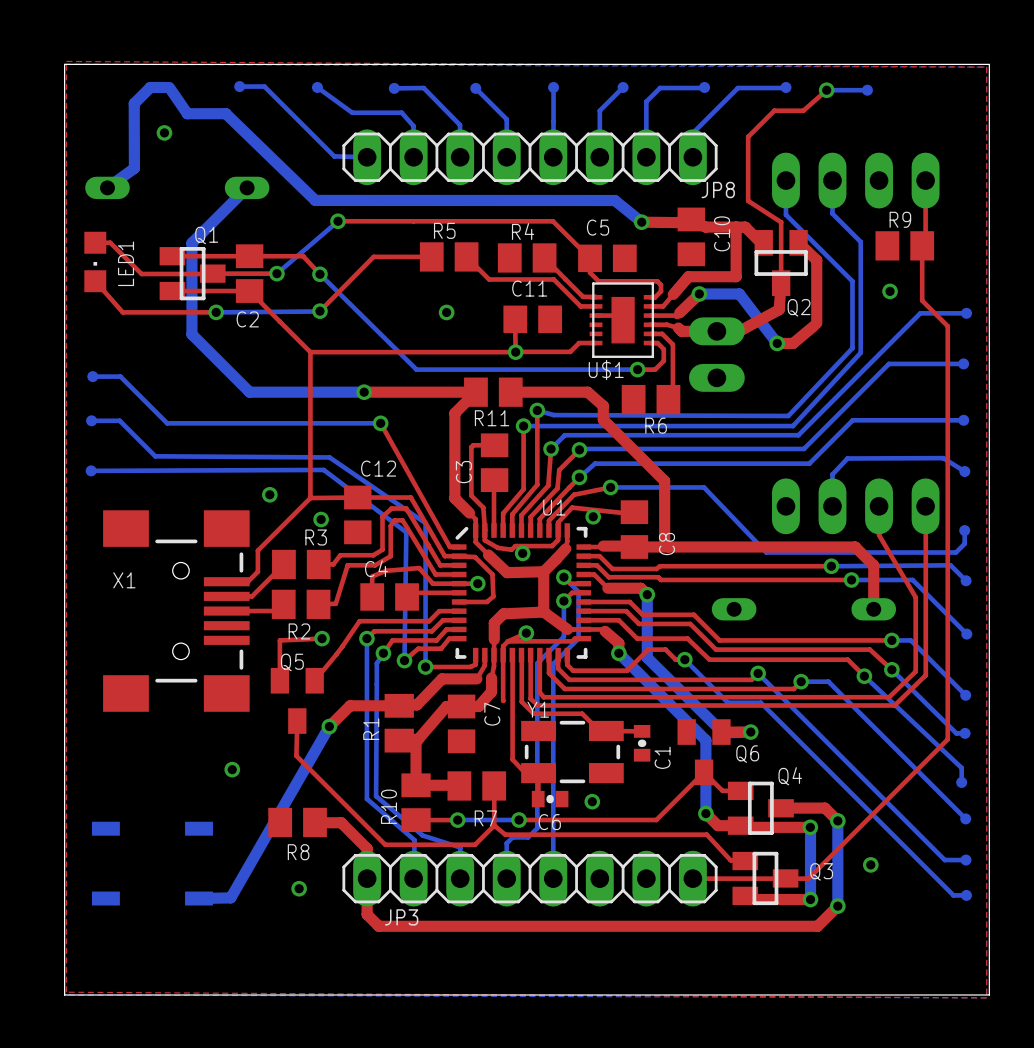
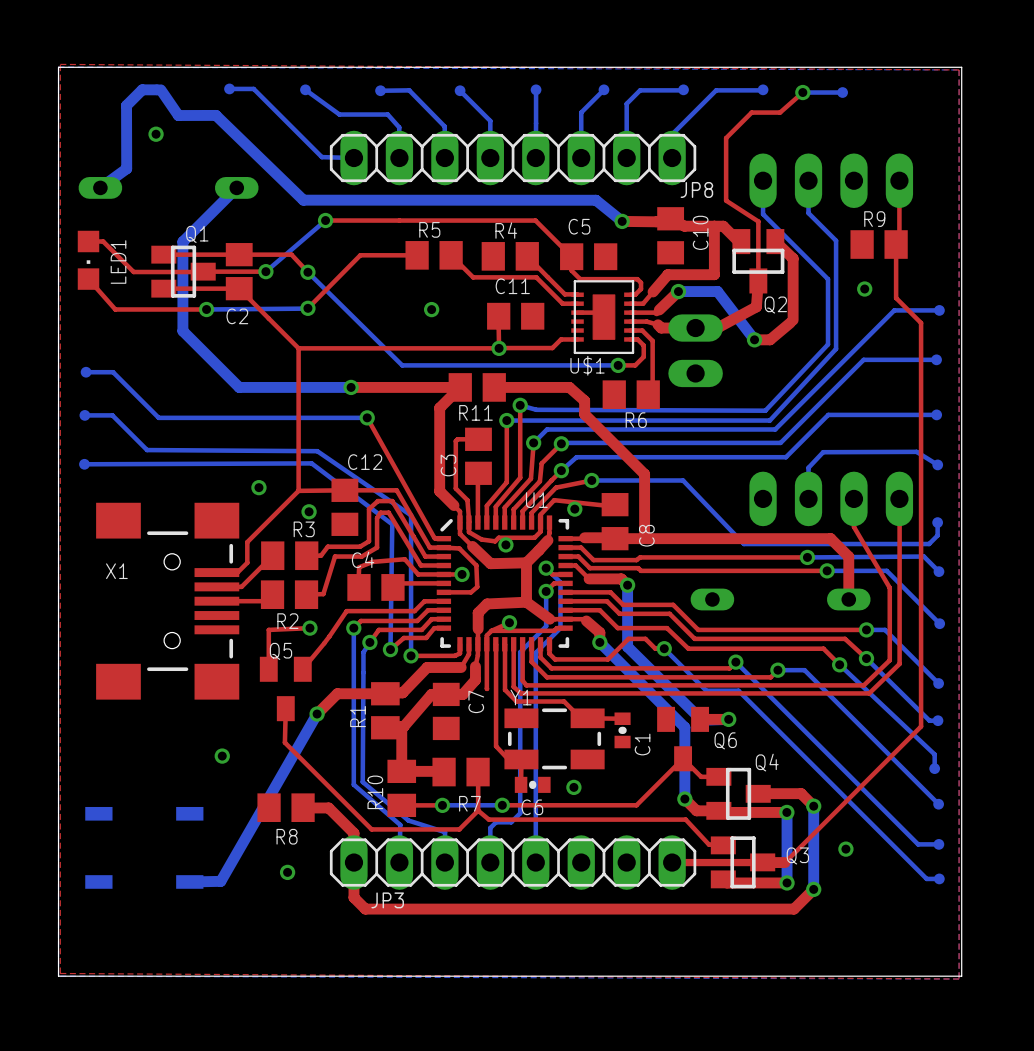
top track width: thin (692, 878) (808, 878) -> thick (672, 862) (785, 862)

